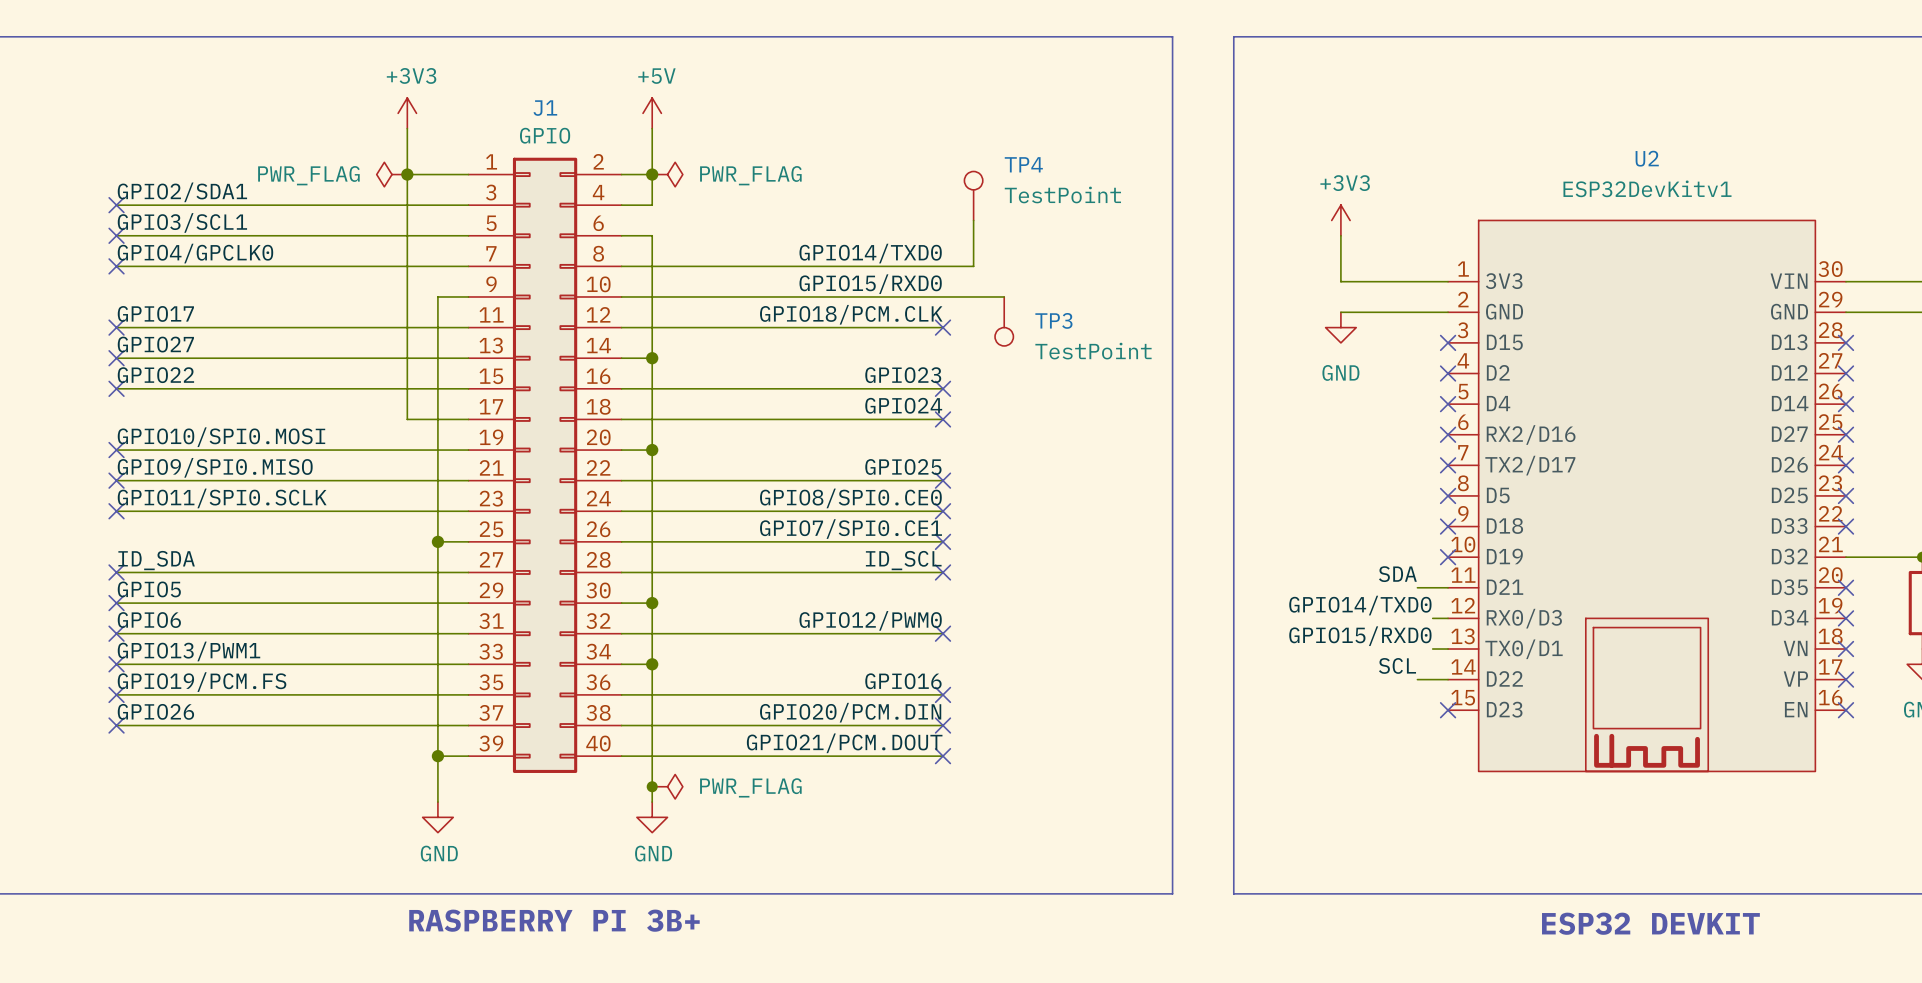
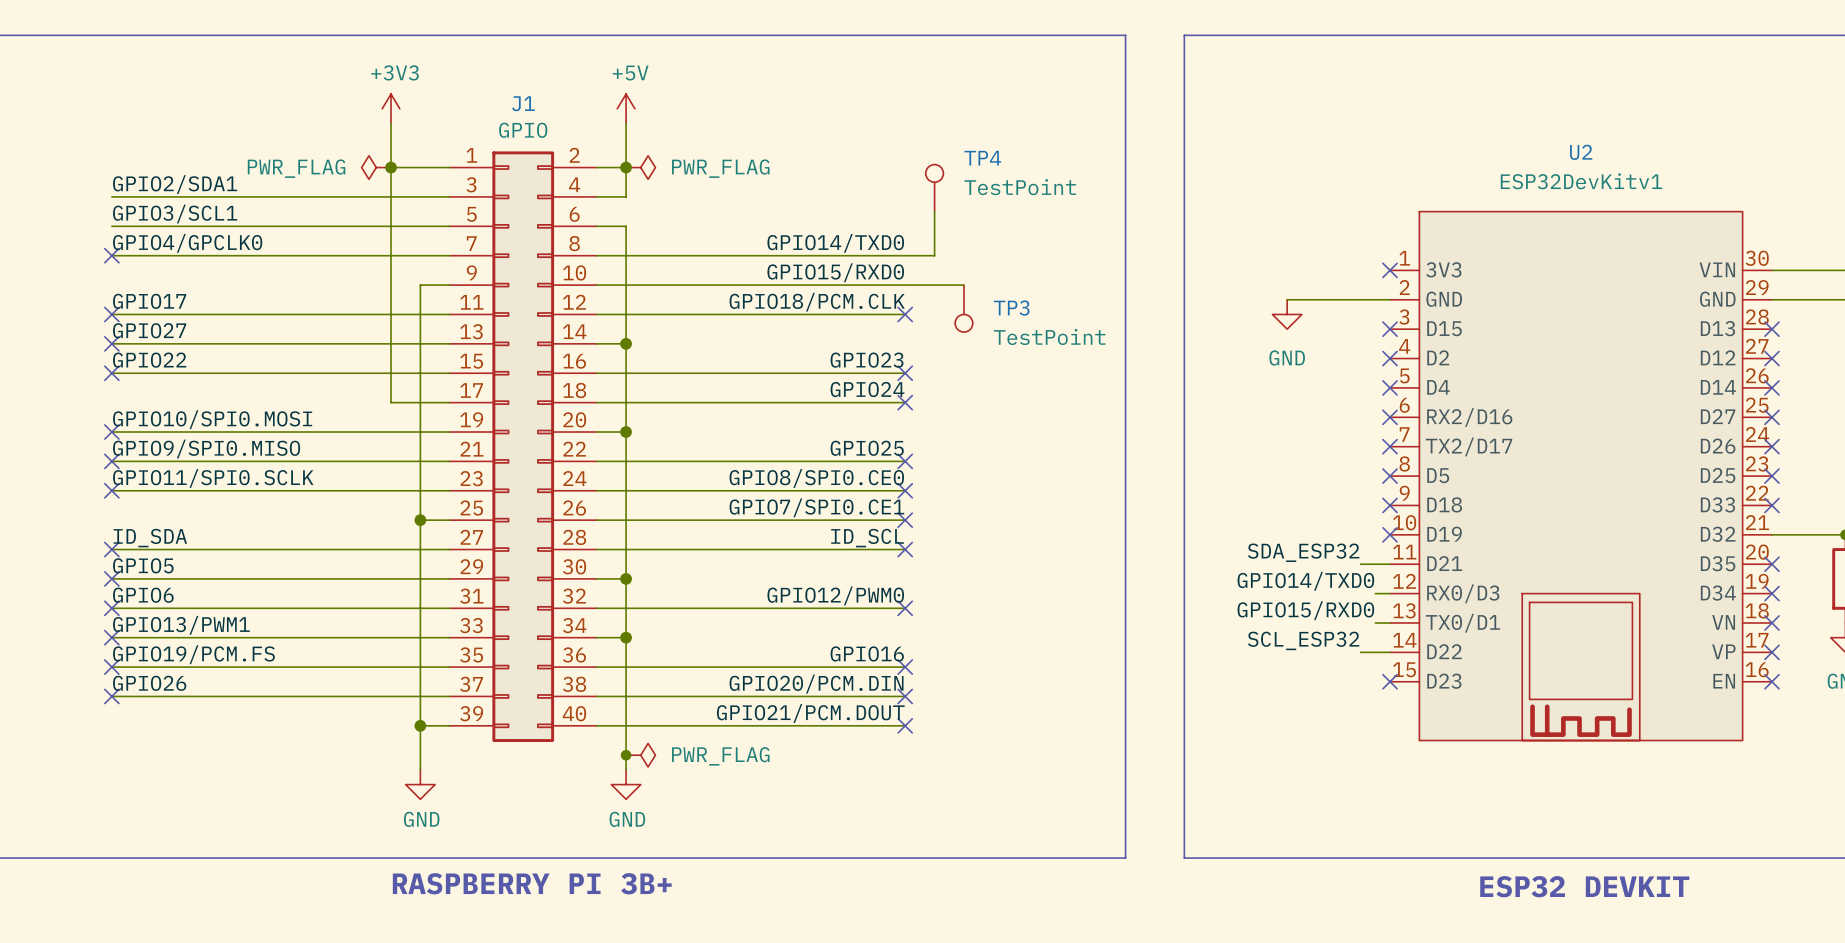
no-connect mark: (116, 205) -> none
power symbol: +3V3 (1340, 220) -> none
no-connect mark: (116, 235) -> none
wire: (1340, 235) (1340, 281) (1448, 281) -> none
no-connect mark: none -> (1390, 270)
label: SDA (1397, 574) -> SDA_ESP32 (1303, 552)
label: SCL (1397, 665) -> SCL_ESP32 (1303, 640)

